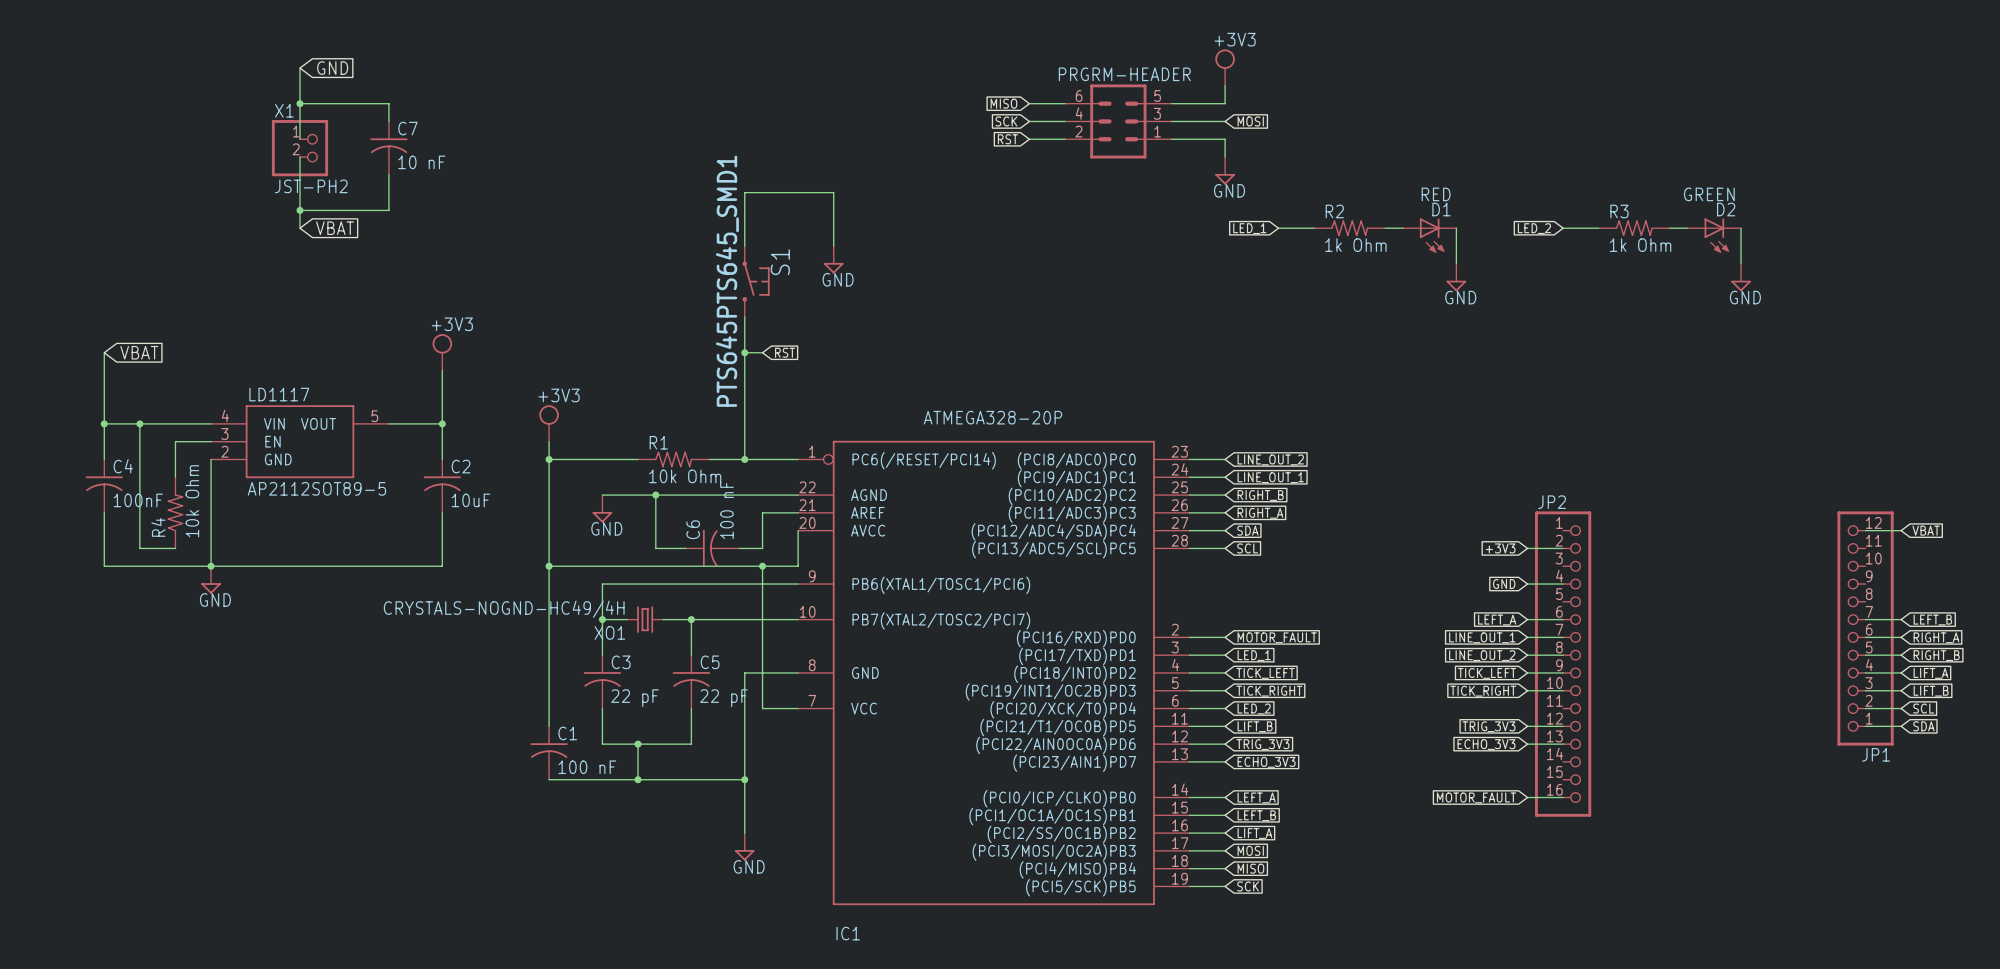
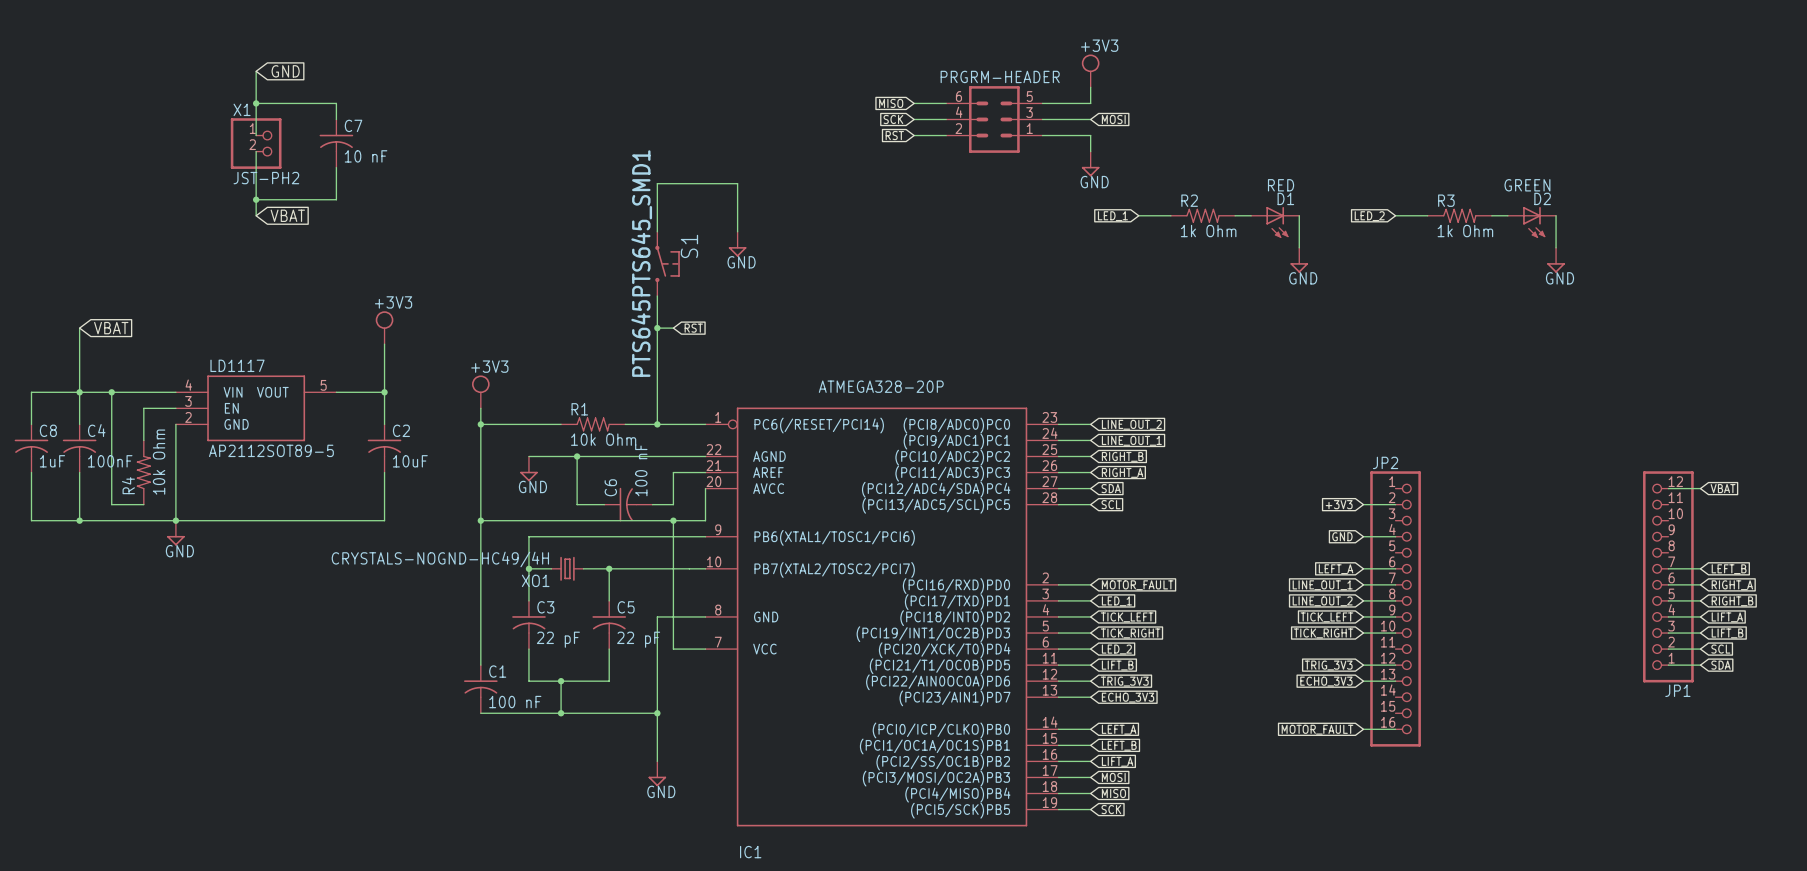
wire: none -> (79, 392) (31, 392) (31, 424)
C8: none -> 1uF (31, 448)
wire: none -> (31, 472) (31, 520) (79, 520)
junction: none -> (79, 520)

